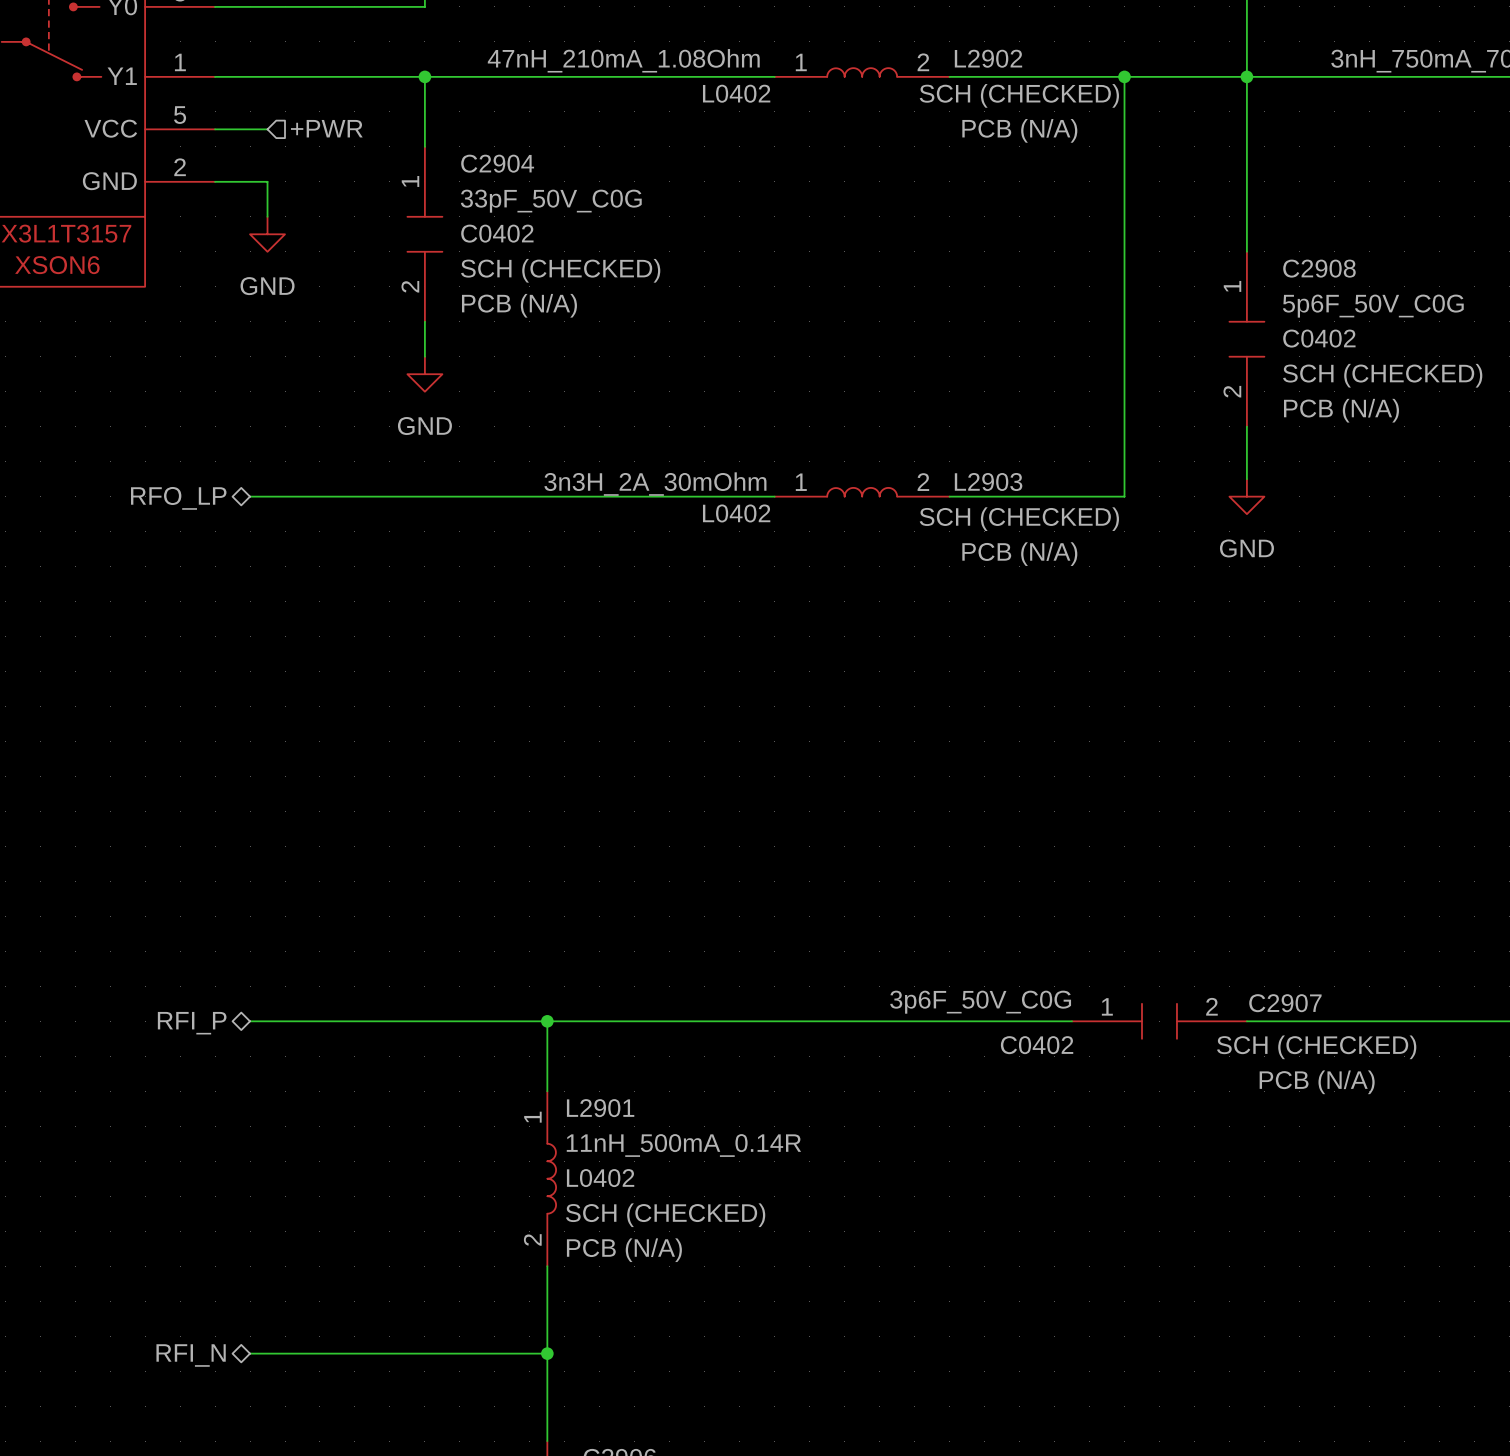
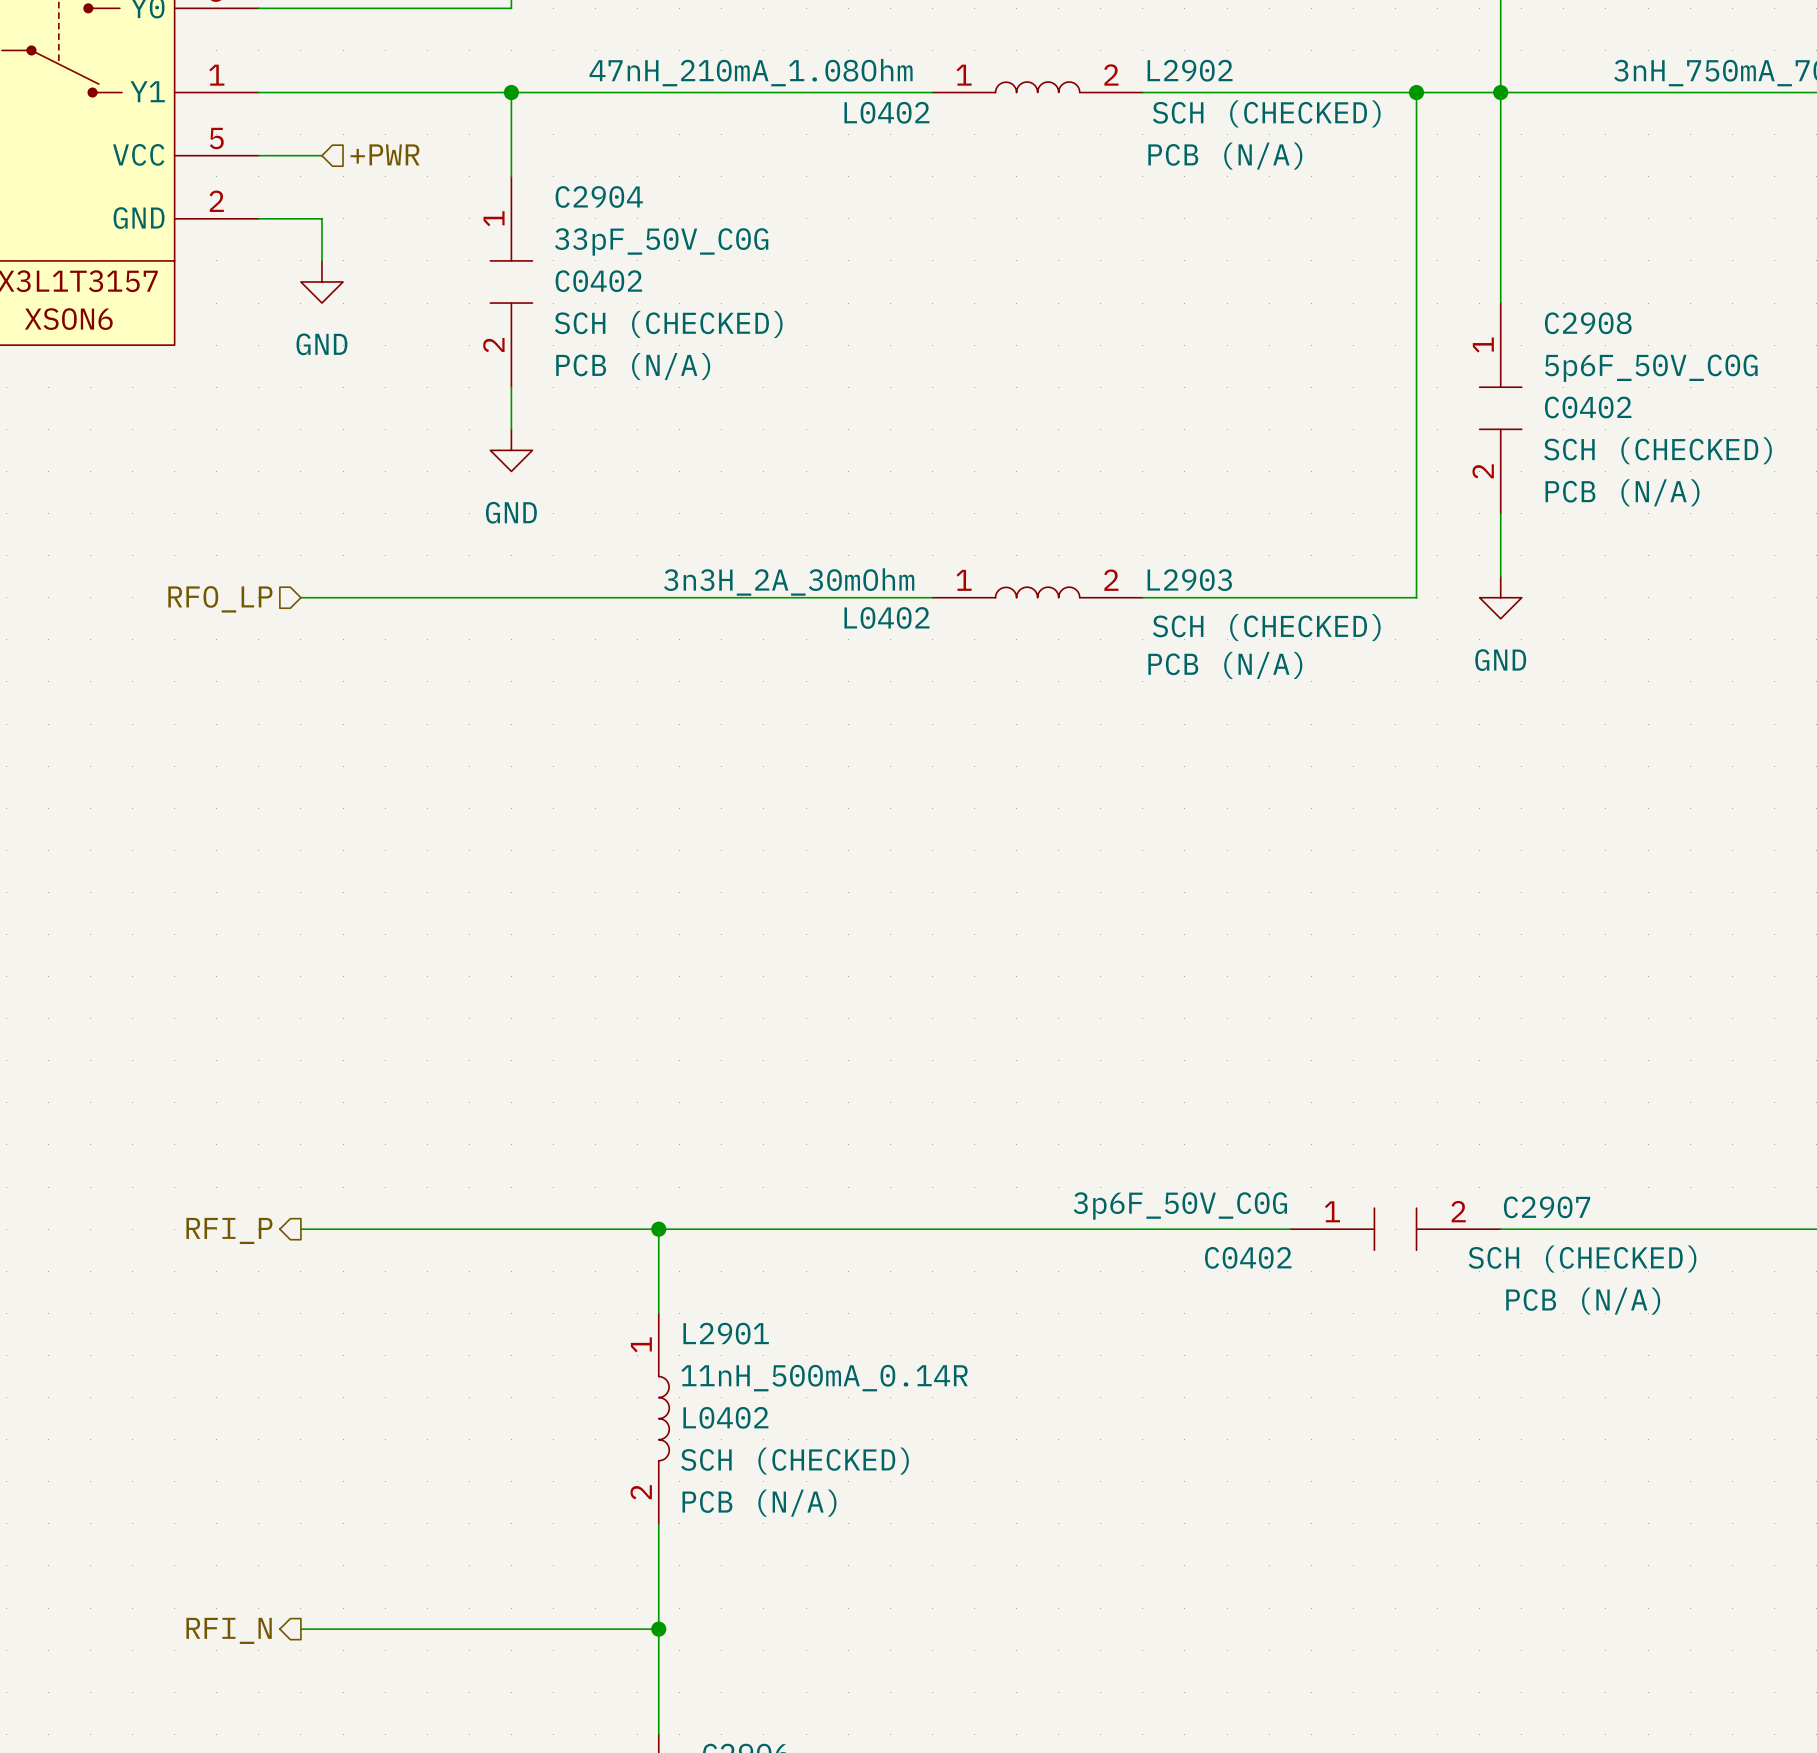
wire: (1124, 76) (1124, 496) -> (1416, 92) (1416, 597) (1353, 597)
junction position: (1124, 76) -> (1416, 92)
L2902 text position: SCH (CHECKED) (1019, 95) -> SCH (CHECKED) (1266, 113)
hierarchical label shape: bidirectional (178, 498) -> input (220, 599)
L2903 text position: SCH (CHECKED) (1019, 519) -> SCH (CHECKED) (1266, 627)
hierarchical label shape: bidirectional (192, 1023) -> output (229, 1230)
hierarchical label shape: bidirectional (191, 1355) -> output (229, 1630)

